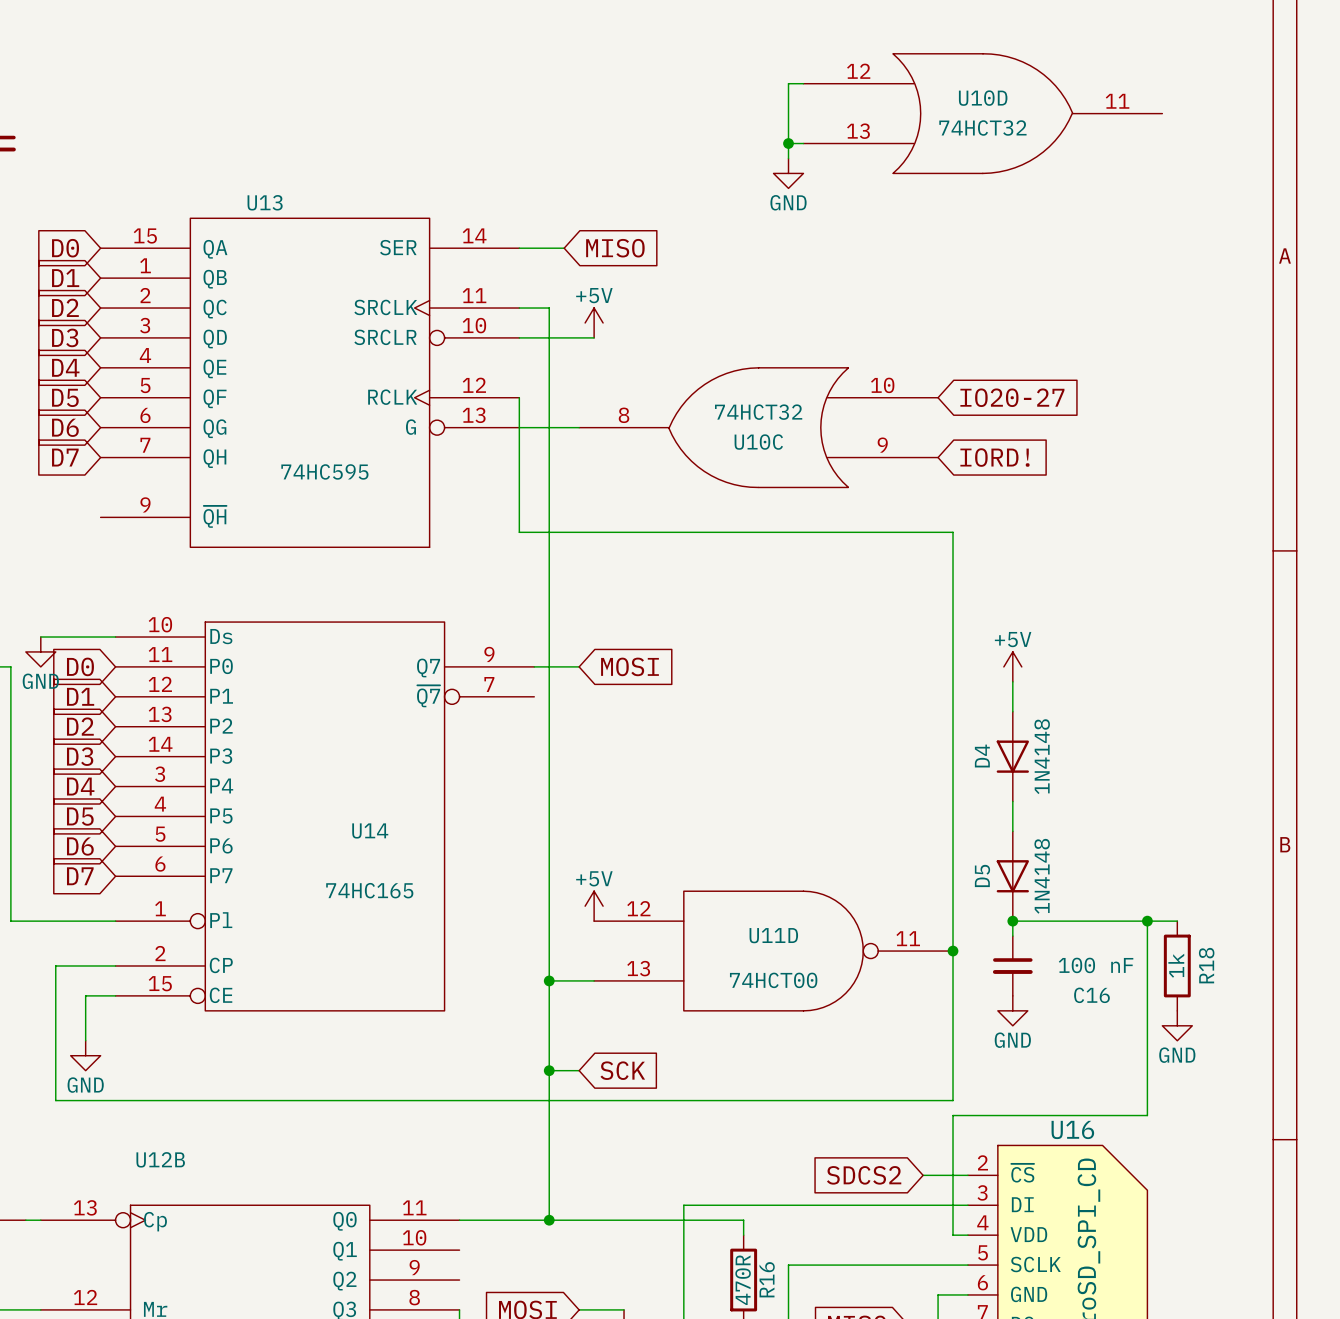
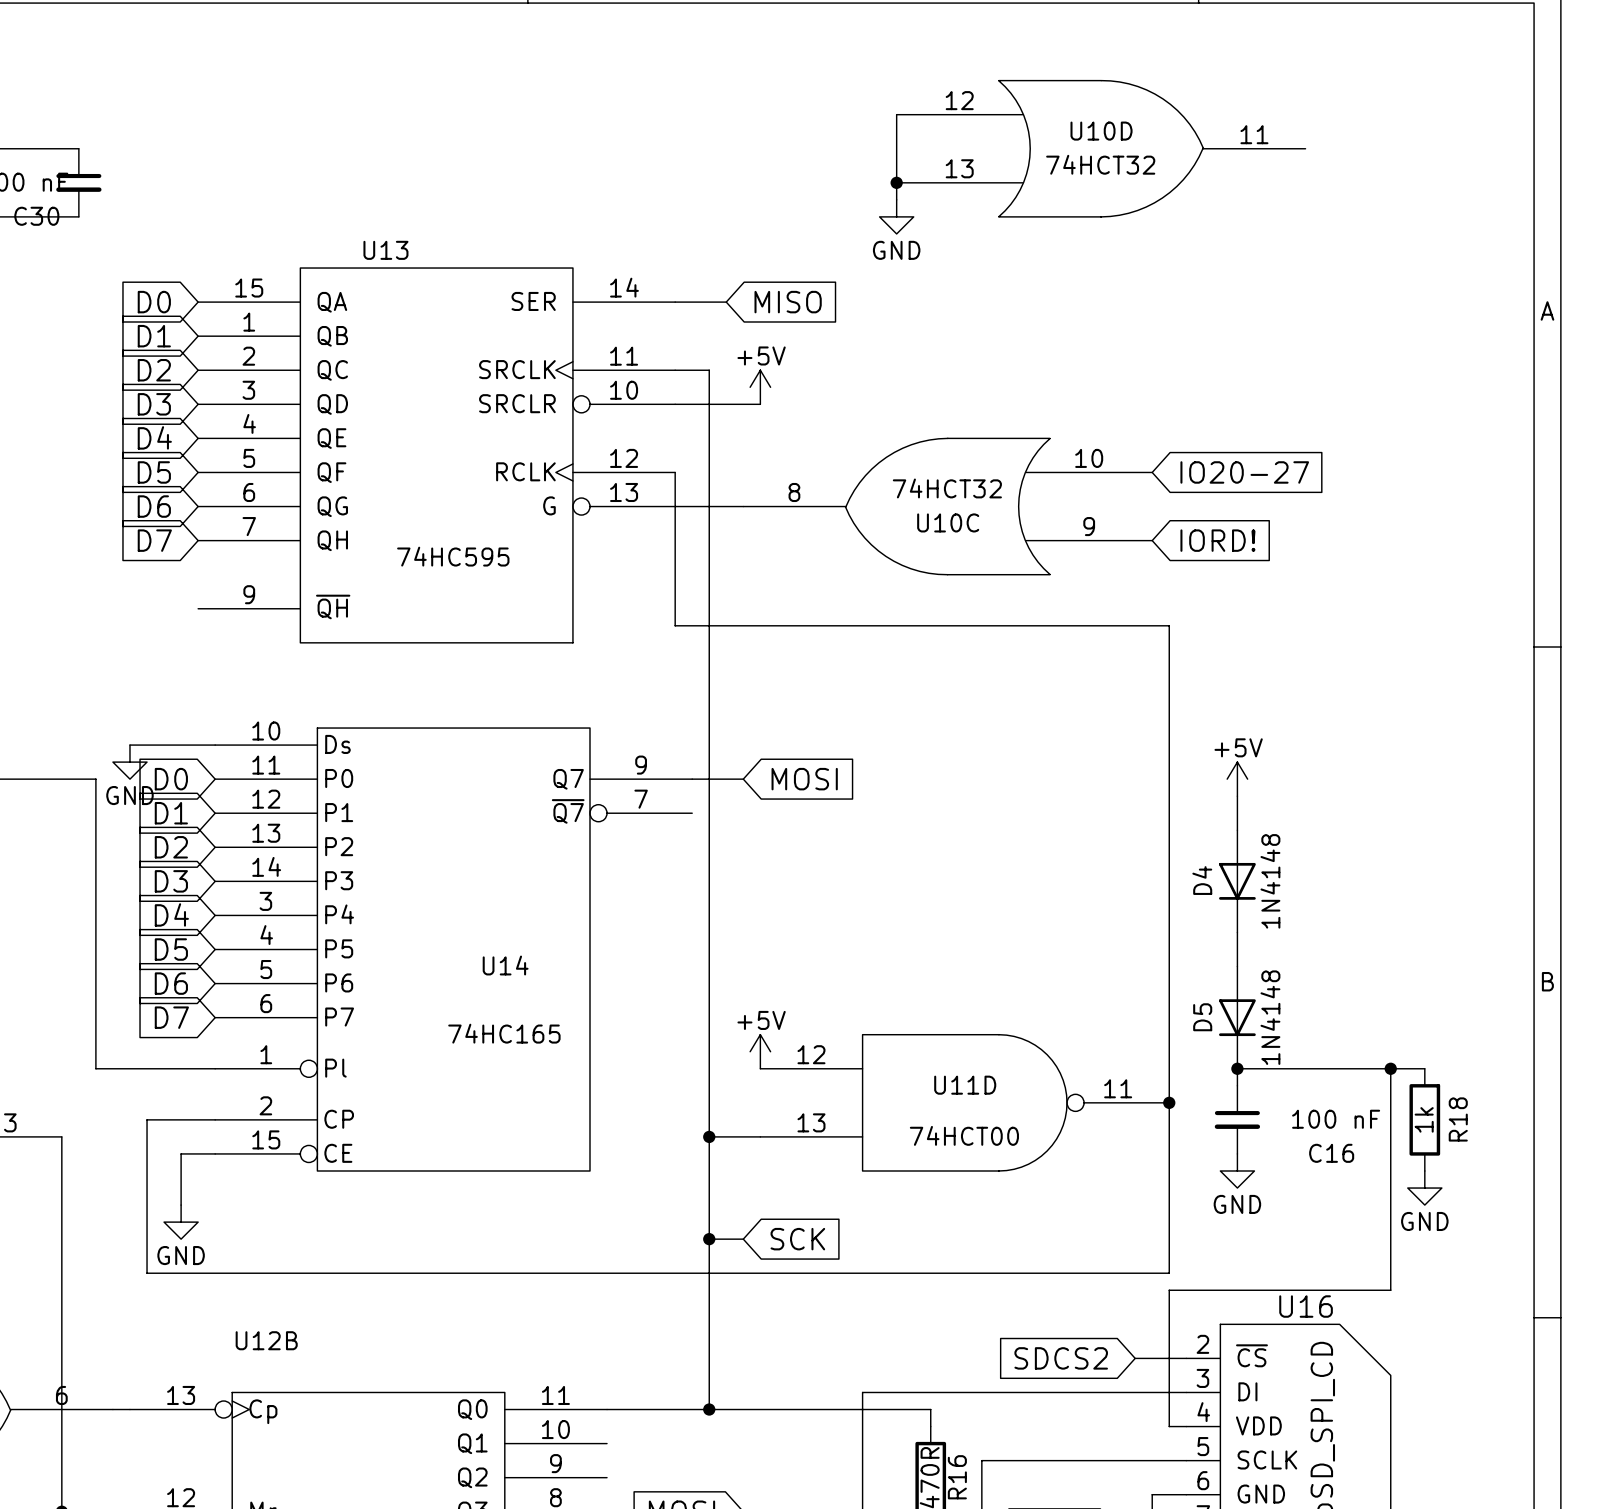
wire: none -> (896, 114) (896, 199)
wire: (803, 83) (788, 83) (788, 158) -> none
U10D position: (982, 113) -> (1101, 148)
junction: none -> (896, 182)
junction: (788, 143) -> none
power symbol position: GND (788, 173) -> GND (896, 216)

